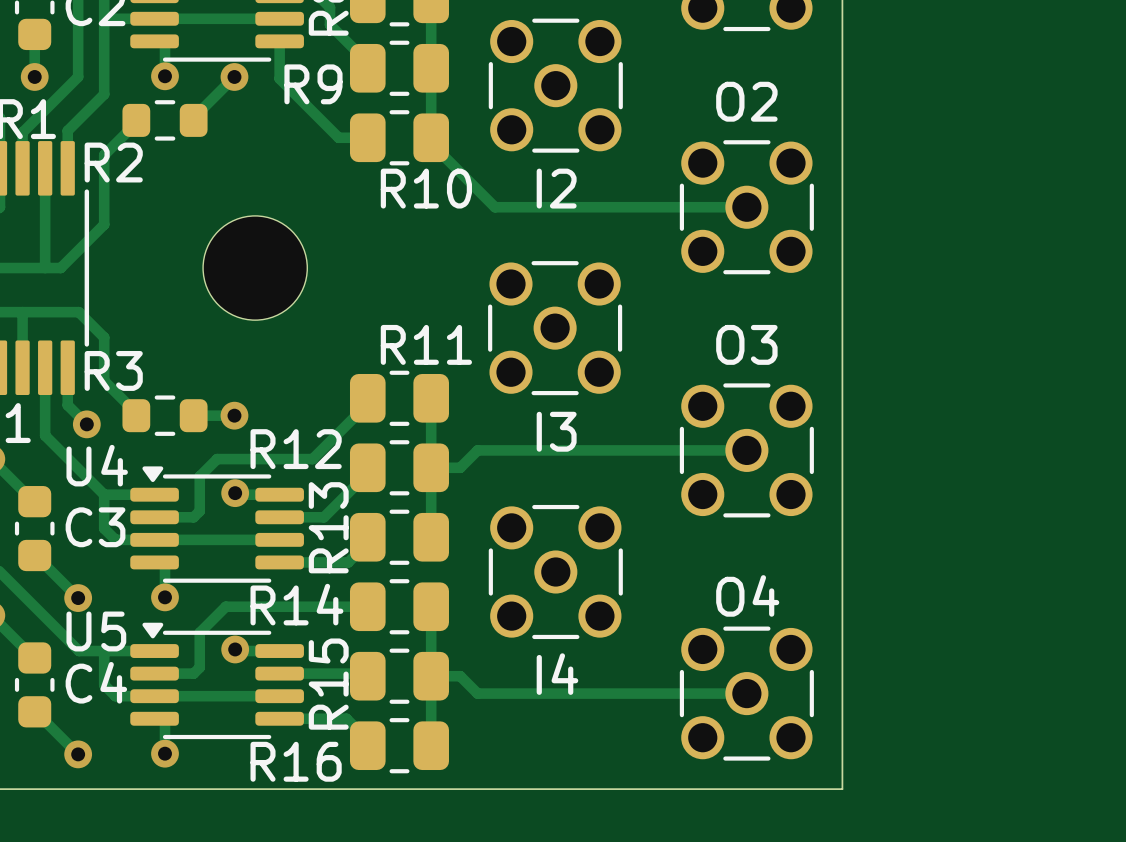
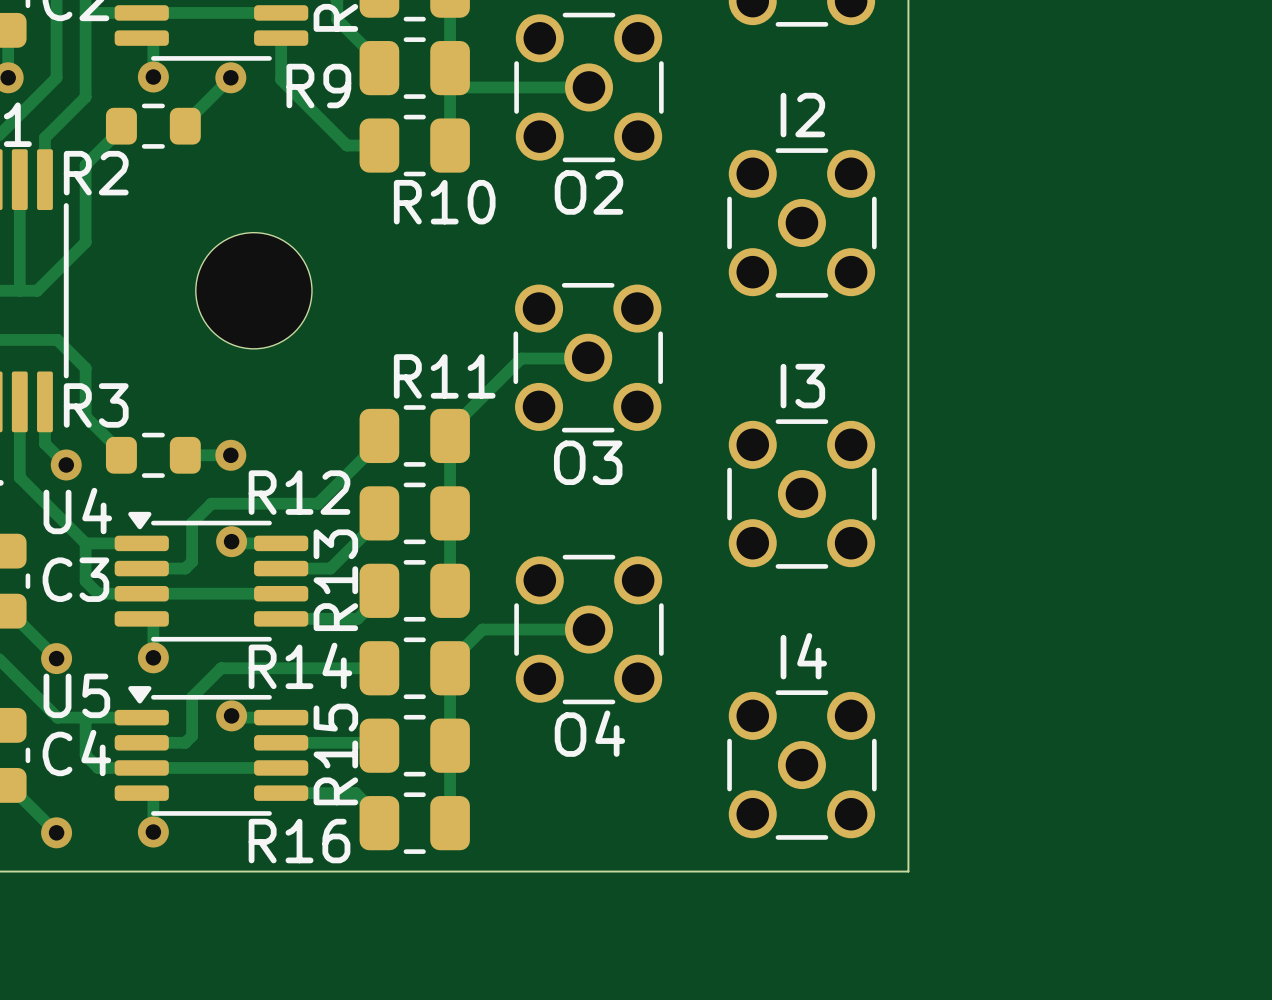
track: none -> (450, 77) (459, 87) (588, 87)
O2 name: O2 (746, 101) -> I2 (802, 115)
track: (431, 137) (431, 143) (495, 207) (746, 207) -> none
I2 name: I2 (556, 188) -> O2 (588, 192)
track: none -> (588, 358) (521, 358) (450, 429) (450, 435)
O3 name: O3 (746, 344) -> I3 (802, 386)
I3 name: I3 (556, 431) -> O3 (588, 462)
track: (746, 450) (477, 450) (460, 467) (431, 467) -> none
track: none -> (588, 629) (482, 629) (450, 661) (450, 668)
O4 name: O4 (747, 595) -> I4 (803, 656)
I4 name: I4 (557, 674) -> O4 (589, 733)
track: (431, 676) (460, 676) (477, 693) (746, 693) -> none

